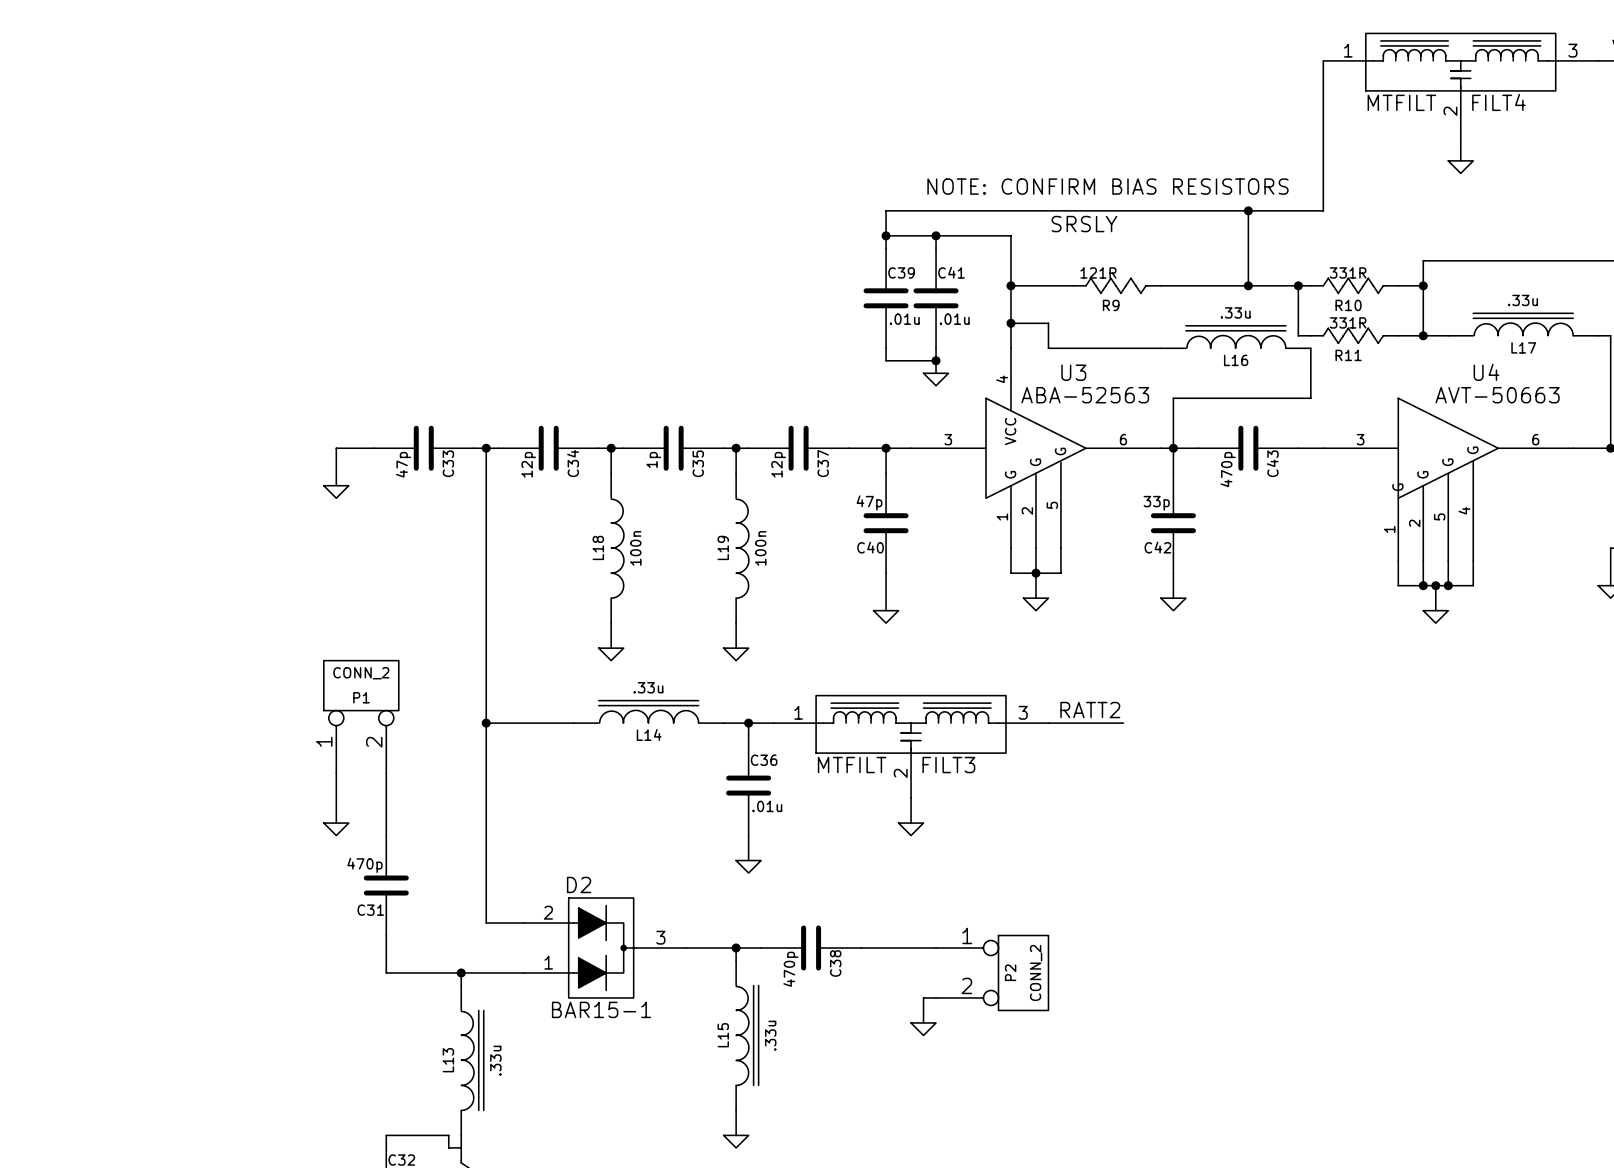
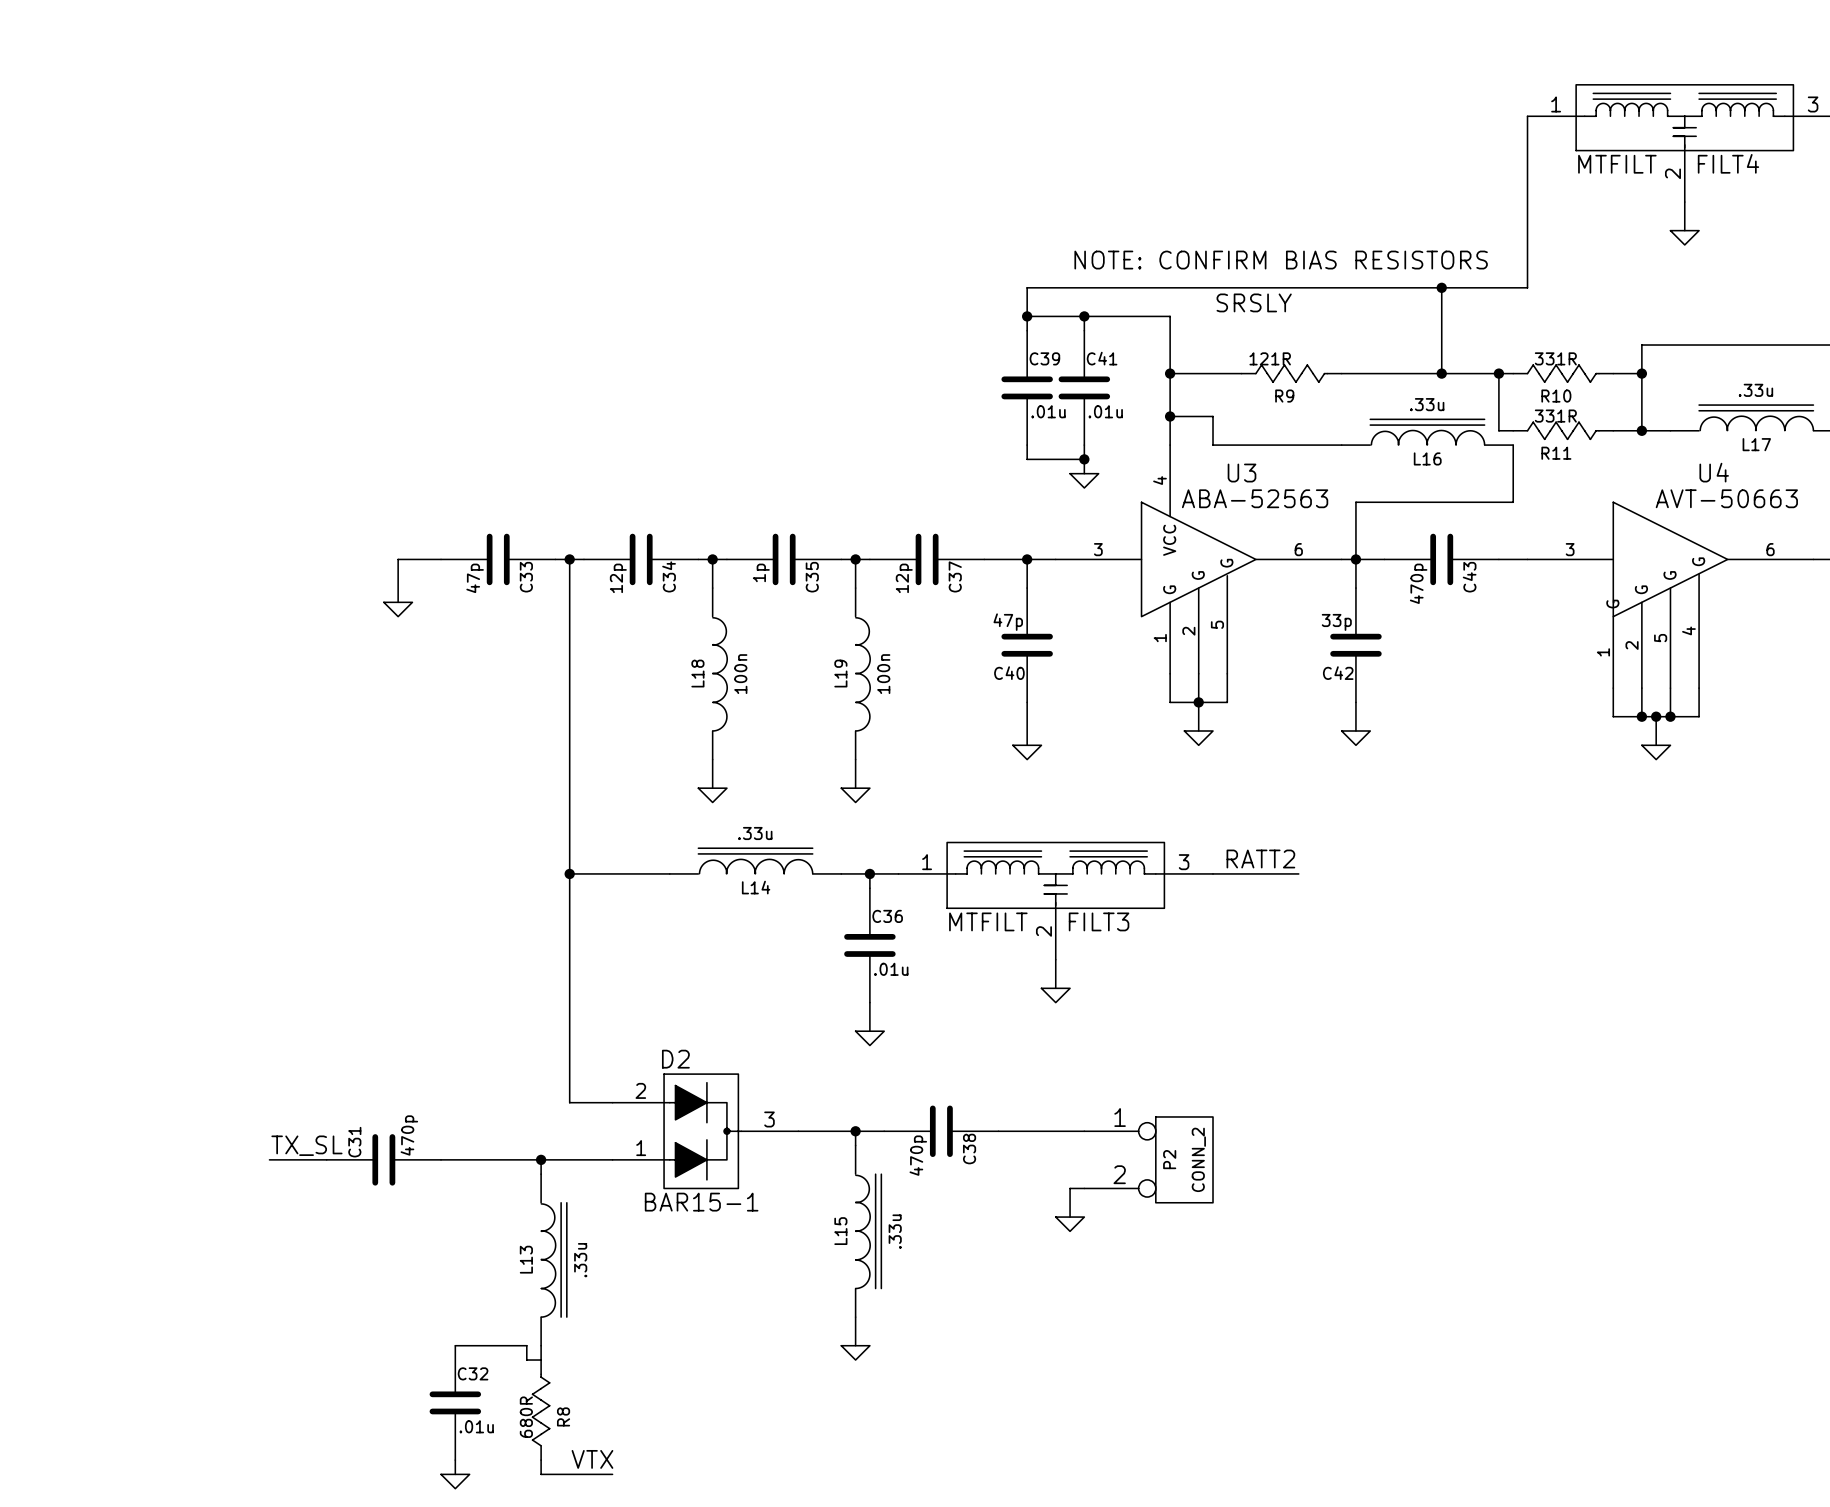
P1: CONN_2 (361, 716) -> none
wire: (336, 773) (336, 823) -> none
wire: (386, 773) (386, 835) -> none
power symbol: (336, 829) -> none
C31 rotation: 0° (386, 885) -> 90° clockwise (383, 1159)
C31 position: (386, 885) -> (383, 1159)
wire: (386, 935) (386, 972) -> (441, 1159) (455, 1159)
label: none -> TX_SL (306, 1145)
wire: none -> (269, 1159) (326, 1159)

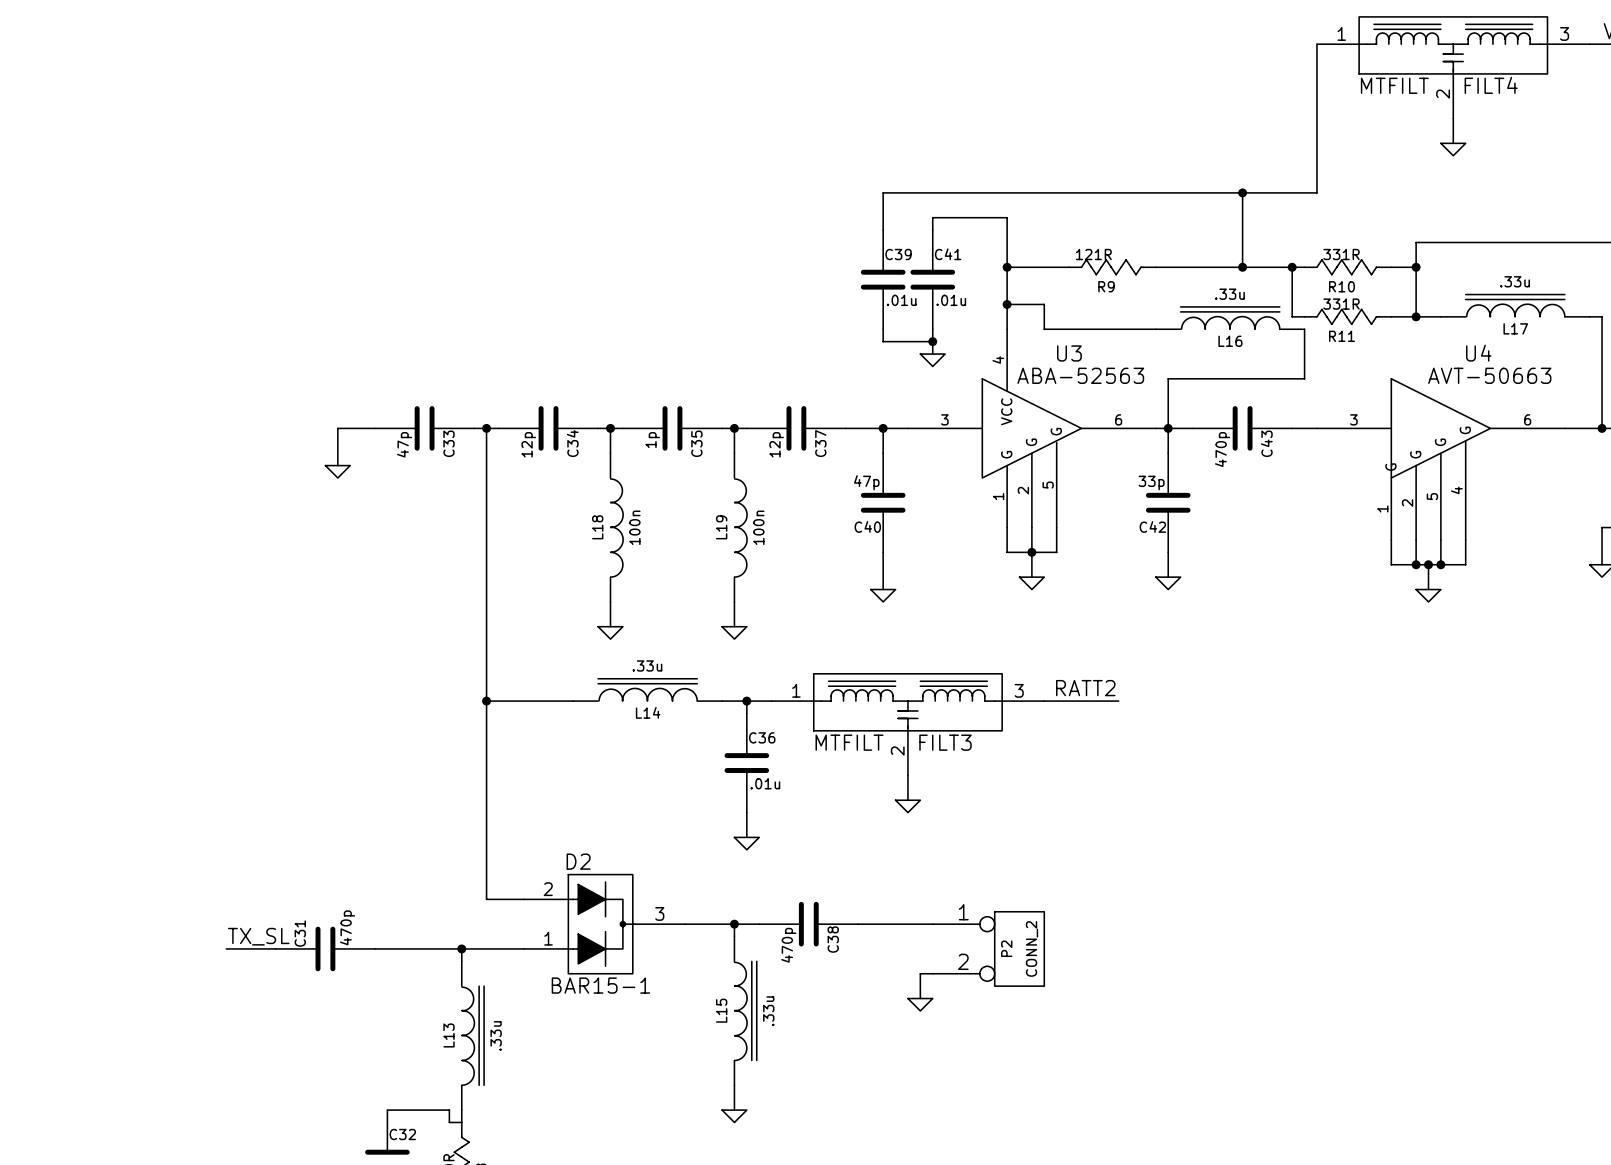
text: NOTE: CONFIRM BIAS RESISTORS (1281, 260) -> none
text: SRSLY (1254, 302) -> none
wire: (1027, 316) (1084, 316) -> none
junction: (1027, 316) -> none
junction: (1084, 316) -> none

